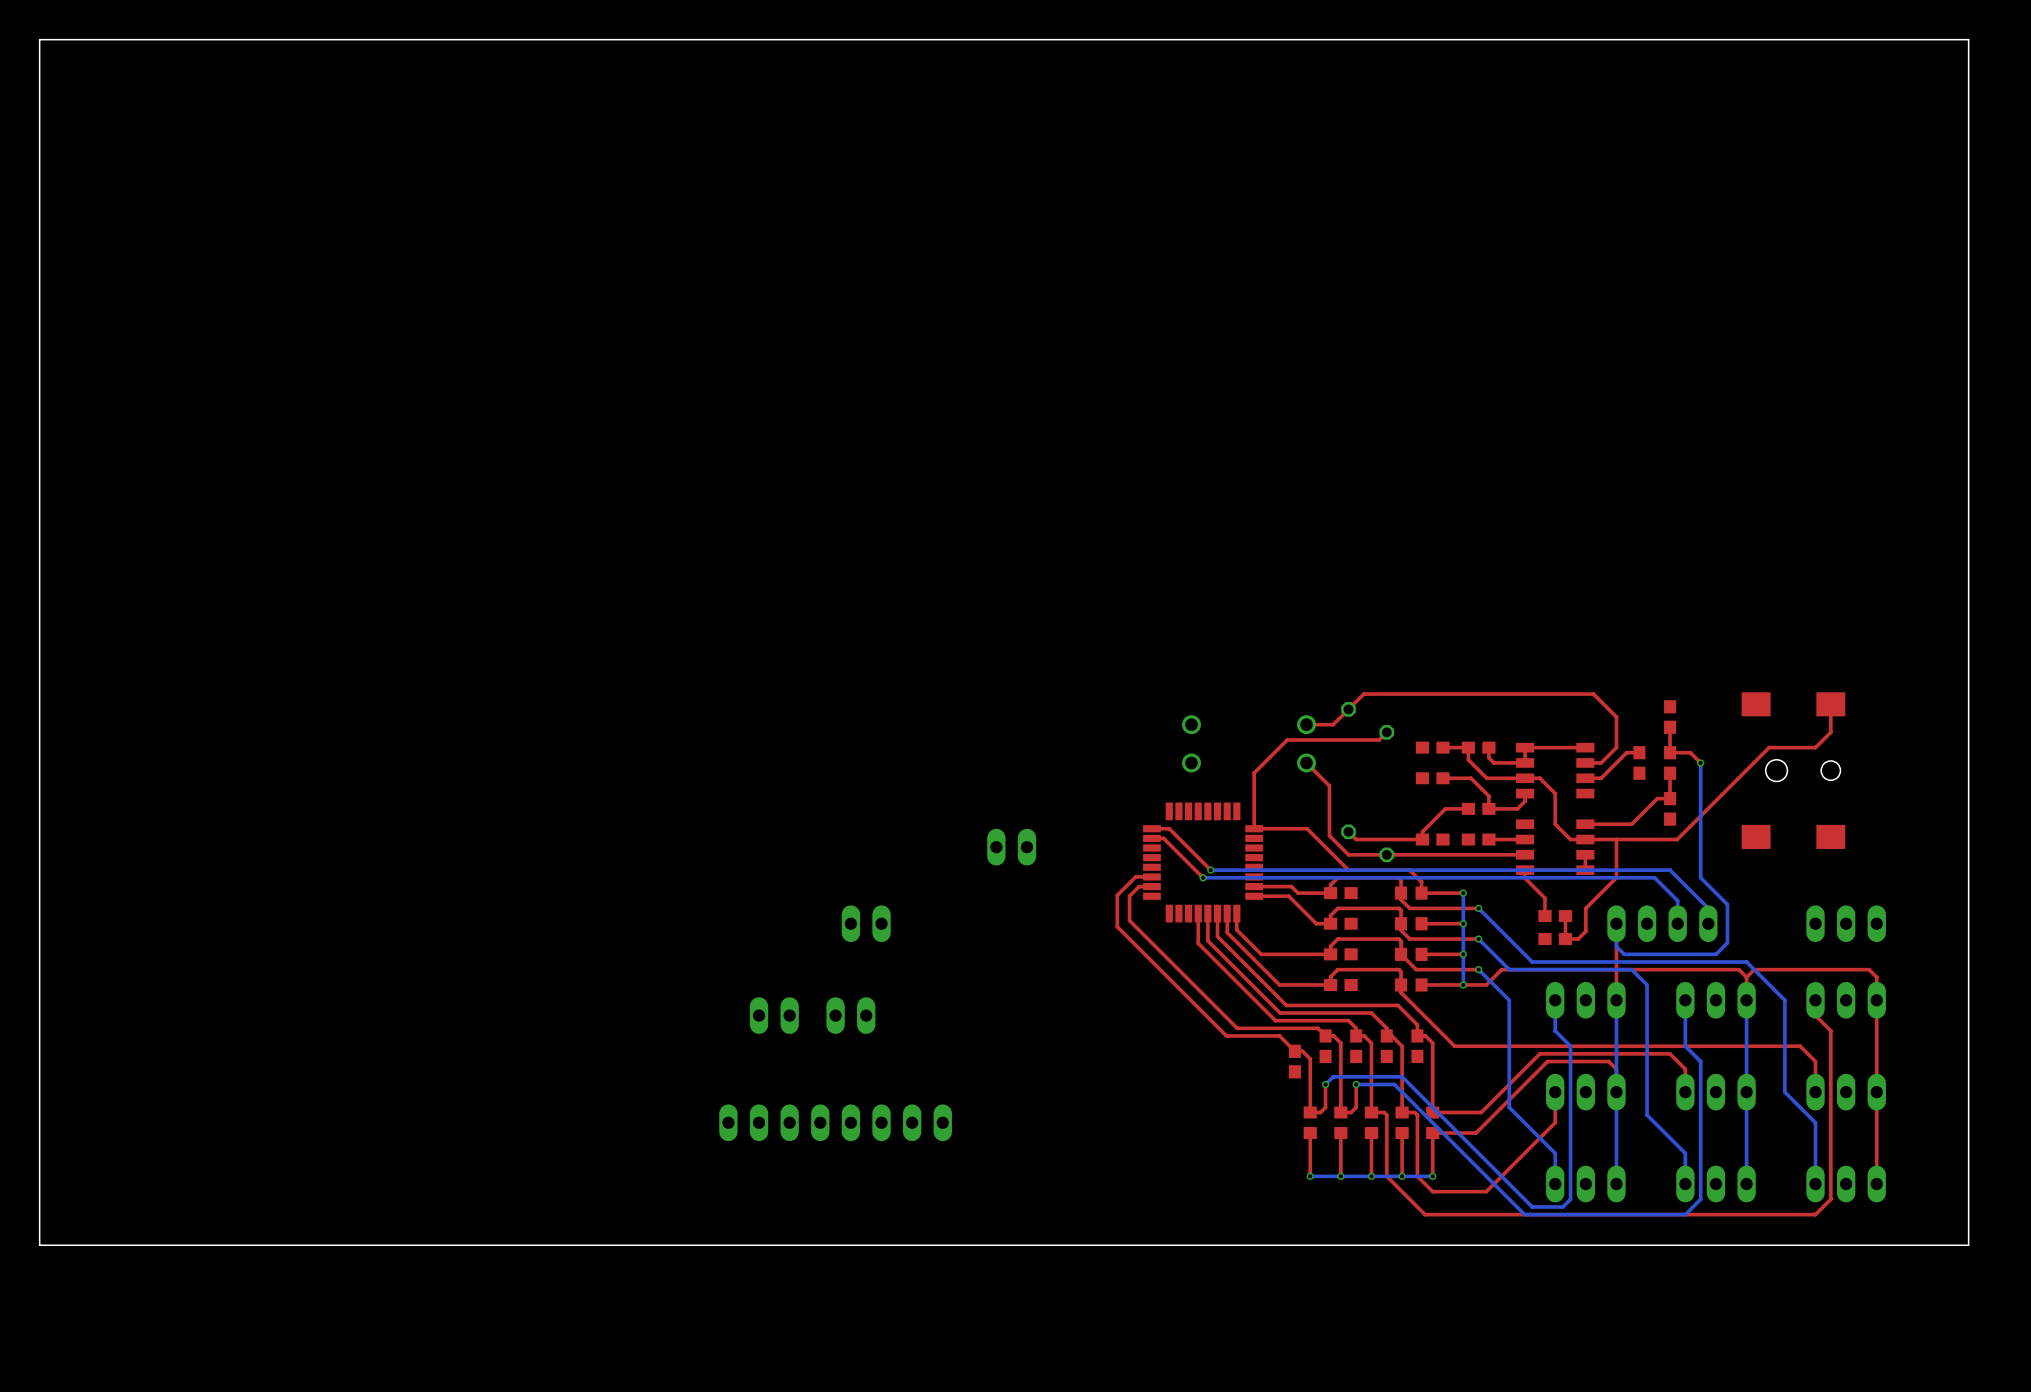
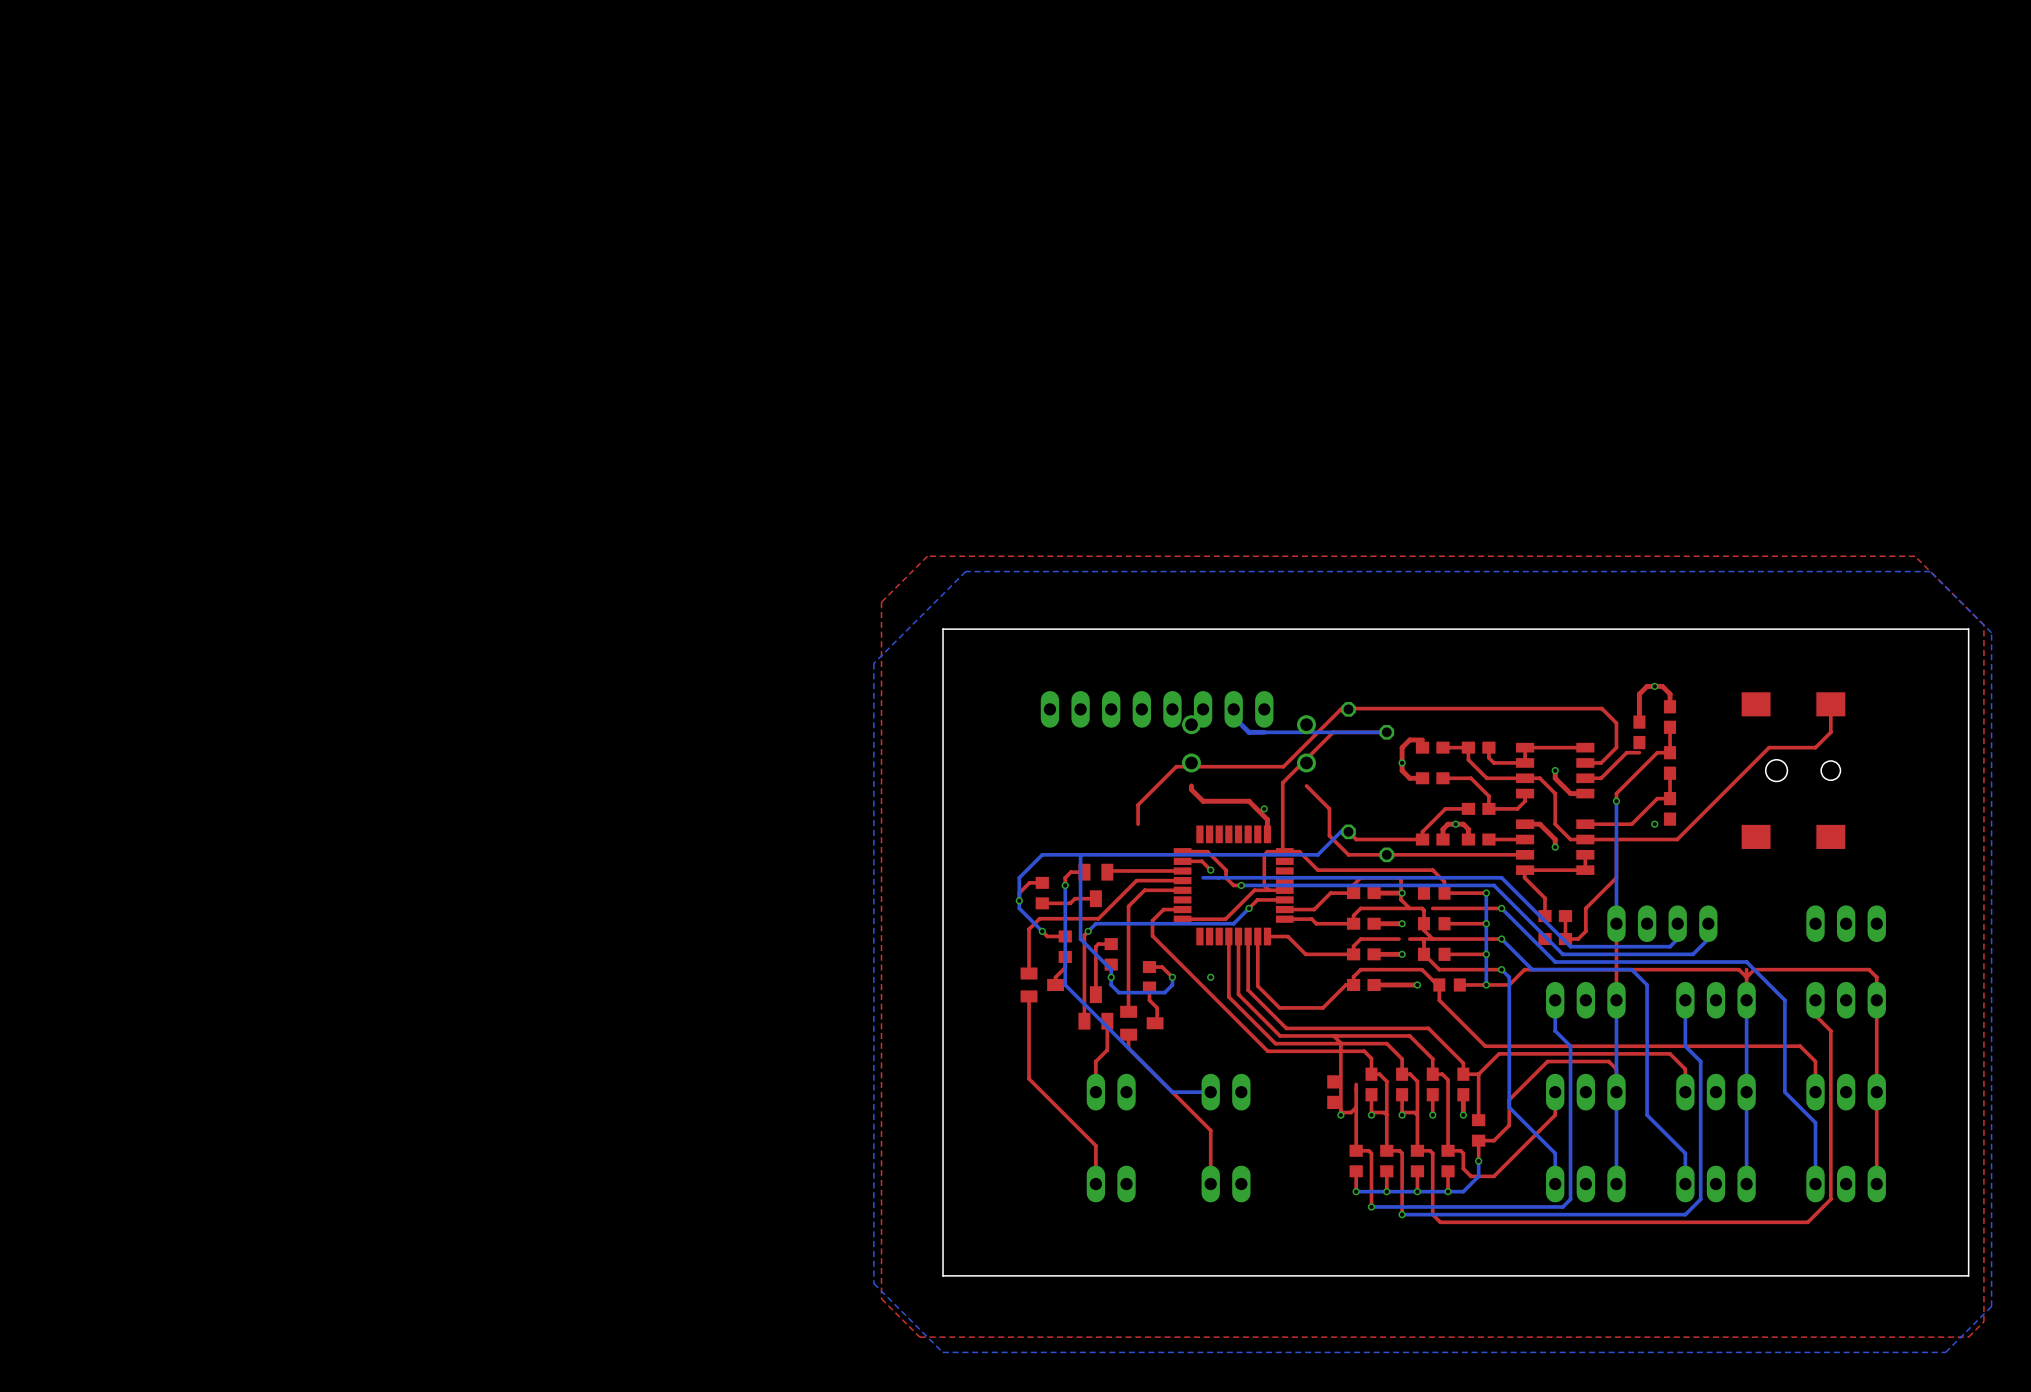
top zone outline: none -> (1915, 556) (1983, 625) (1983, 1321) (1968, 1337) (919, 1337) (881, 1298) (881, 602) (927, 556) (1915, 556)
bottom zone outline: none -> (1930, 571) (1991, 632) (1991, 1306) (1945, 1352) (942, 1352) (873, 1283) (873, 663) (965, 571) (1930, 571)
board edge: (1968, 629) (1968, 39) (39, 39) (39, 1245) (1968, 1245) -> (1968, 629) (943, 629) (943, 1275) (1968, 1275) (1968, 1245)
via: none -> (1654, 686)
top track: none -> (1670, 706) (1670, 694) (1662, 686) (1647, 686) (1639, 694) (1639, 722)
top track: (1349, 708) (1363, 694) (1593, 694) (1616, 717) (1616, 723) -> (1349, 708) (1601, 708) (1616, 723)
part: none -> (1157, 709)
bottom track: none -> (1233, 709) (1233, 717) (1249, 732) (1386, 732)
top track: (1348, 709) (1333, 724) (1306, 724) -> (1348, 709) (1340, 709) (1283, 766) (1176, 766) (1138, 804) (1138, 824)
top track: (1386, 732) (1379, 739) (1287, 739) (1254, 773) (1254, 828) (1307, 828) (1348, 870) -> (1386, 732) (1333, 732) (1282, 782) (1282, 849) (1284, 851)
top track: none -> (1422, 739) (1409, 739) (1402, 747) (1402, 770) (1409, 778) (1422, 778)
top track: (1670, 752) (1690, 752) (1700, 762) -> (1670, 752) (1657, 752) (1616, 793) (1616, 801)
top track: (1306, 762) (1329, 785) (1329, 808) -> (1306, 785) (1329, 808)
via: none -> (1402, 762)
part position: (1639, 762) -> (1639, 732)
bottom track: (1700, 762) (1700, 877) (1727, 904) (1727, 942) (1715, 954) (1693, 954) -> (1708, 923) (1708, 939) (1693, 954)
via: (1700, 762) -> none
top track: none -> (1555, 770) (1555, 778) (1570, 793) (1585, 793)
via: none -> (1555, 770)
top track: none -> (1191, 785) (1191, 789) (1203, 801) (1249, 801) (1267, 819) (1267, 834)
bottom track: none -> (1616, 801) (1616, 916)
via: none -> (1616, 801)
via: none -> (1264, 808)
via: none -> (1455, 824)
top track: none -> (1525, 824) (1539, 824) (1555, 839) (1555, 847)
via: none -> (1654, 824)
top track: (1151, 828) (1169, 828) (1201, 861) -> (1182, 861) (1201, 861)
bottom track: none -> (1348, 831) (1340, 831) (1317, 854) (1042, 854) (1019, 877) (1019, 908) (1042, 931)
top track: (1151, 838) (1163, 838) (1203, 877) -> none
top track: none -> (1468, 839) (1468, 829) (1463, 824) (1448, 824) (1442, 829) (1442, 839)
part: (1011, 847) -> none
via: none -> (1555, 847)
top track: none -> (1182, 851) (1207, 851) (1226, 870) (1226, 877) (1233, 885) (1241, 885)
bottom track: none -> (1080, 854) (1080, 939) (1111, 969) (1111, 984) (1118, 992) (1164, 992) (1172, 984) (1172, 977)
part position: (1203, 862) -> (1233, 885)
top track: none -> (1182, 870) (1107, 872)
bottom track: (1210, 870) (1670, 870) (1708, 908) (1708, 916) -> none
top track: none -> (1348, 870) (1317, 870) (1299, 851) (1267, 851) (1264, 854) (1264, 885) (1269, 890)
top track: (1409, 870) (1421, 881) (1421, 893) (1444, 893) -> (1409, 870) (1432, 870) (1444, 881) (1444, 893)
top track: none -> (1084, 872) (1070, 872) (1065, 877) (1065, 885)
top track: (1151, 876) (1135, 876) (1117, 895) (1117, 926) (1226, 1035) (1279, 1035) (1294, 1051) -> (1182, 909) (1163, 909) (1152, 920) (1152, 935) (1267, 1051) (1294, 1051)
via: (1203, 877) -> none
top track: (1360, 877) (1337, 877) (1330, 884) (1330, 893) (1297, 893) (1291, 886) (1254, 886) -> (1360, 877) (1353, 884) (1353, 893) (1330, 893) (1314, 909) (1284, 909)
bottom track: (1501, 877) (1654, 877) (1677, 900) (1677, 916) -> (1501, 877) (1570, 946) (1670, 946) (1677, 939) (1677, 923)
top track: none -> (1182, 880) (1136, 880) (1098, 918) (1039, 918) (1029, 929) (1029, 973)
top track: none -> (1042, 882) (1029, 882) (1019, 893) (1019, 900)
bottom track: none -> (1065, 885) (1065, 984) (1172, 1092) (1210, 1092)
via: none -> (1065, 885)
part: none -> (1095, 885)
via: none -> (1241, 885)
top track: (1151, 886) (1139, 886) (1129, 896) (1129, 920) (1237, 1028) (1317, 1028) (1325, 1035) -> (1238, 936) (1238, 994) (1280, 1035) (1325, 1035)
top track: none -> (1182, 890) (1144, 890) (1128, 906) (1128, 1011)
top track: none -> (1284, 890) (1254, 890) (1225, 919) (1182, 919)
part: none -> (1042, 893)
part: (1340, 893) -> none
part: none -> (1363, 893)
top track: none -> (1402, 893) (1374, 893)
via: none -> (1402, 893)
part: (1411, 893) -> none
part: none -> (1434, 893)
bottom track: (1463, 893) (1463, 984) -> (1486, 893) (1486, 984)
via: (1463, 893) -> none
top track: none -> (1486, 893) (1463, 893)
via: none -> (1486, 893)
top track: (1254, 896) (1288, 896) (1311, 919) -> (1284, 919) (1311, 919)
top track: none -> (1095, 898) (1074, 898) (1070, 903) (1042, 903)
top track: none -> (1284, 899) (1257, 899) (1249, 908)
via: none -> (1019, 900)
bottom track: none -> (1249, 908) (1233, 923) (1095, 923) (1088, 931)
via: none -> (1249, 908)
top track: (1360, 908) (1337, 908) (1330, 915) (1330, 923) -> (1360, 908) (1353, 915) (1353, 923) (1330, 923)
top track: (1399, 908) (1401, 910) (1401, 930) (1409, 939) -> (1399, 908) (1409, 908)
top track: (1432, 908) (1422, 908) -> (1432, 939) (1424, 930) (1424, 910) (1422, 908)
bottom track: (1478, 908) (1532, 962) (1555, 962) -> (1501, 908) (1555, 962)
via: (1478, 908) -> none
top track: none -> (1501, 908) (1478, 908)
via: none -> (1501, 908)
top track: (1198, 913) (1198, 943) (1275, 1020) (1348, 1020) (1356, 1028) (1356, 1035) -> (1333, 1035) (1356, 1035)
top track: (1207, 913) (1207, 940) (1280, 1013) (1371, 1013) (1386, 1028) (1386, 1035) -> none
top track: (1217, 913) (1217, 936) (1286, 1005) (1397, 1005) (1417, 1024) (1417, 1035) (1425, 1035) (1432, 1043) (1432, 1058) -> none
top track: (1227, 913) (1227, 932) (1279, 984) (1330, 984) (1330, 976) (1337, 969) (1360, 969) -> (1257, 936) (1257, 986) (1279, 1007) (1322, 1007) (1345, 984) (1353, 984) (1353, 976) (1360, 969)
top track: (1236, 913) (1236, 929) (1261, 954) (1305, 954) -> (1267, 936) (1287, 936) (1305, 954)
part: (866, 923) -> none
part: (1340, 923) -> none
part: none -> (1363, 923)
top track: none -> (1402, 923) (1374, 923)
via: none -> (1402, 923)
part: (1411, 923) -> none
part: none -> (1434, 923)
top track: (1444, 923) (1421, 923) -> (1486, 923) (1463, 923)
via: (1463, 923) -> none
via: none -> (1486, 923)
bottom track: (1616, 923) (1616, 946) (1624, 954) -> (1241, 885) (1493, 885) (1562, 954) (1624, 954)
top track: none -> (1042, 931) (1047, 936) (1065, 936)
via: none -> (1042, 931)
top track: none -> (1088, 931) (1084, 935) (1084, 1021)
via: none -> (1088, 931)
top track: none -> (1228, 936) (1228, 996) (1275, 1043) (1386, 1043) (1402, 1058)
top track: none -> (1248, 936) (1248, 990) (1286, 1028) (1428, 1028) (1463, 1063) (1463, 1074) (1478, 1074)
top track: (1360, 939) (1337, 939) (1330, 946) (1330, 954) -> (1360, 939) (1353, 946) (1353, 954) (1330, 954)
top track: (1399, 939) (1401, 941) (1401, 954) (1416, 969) -> (1399, 969) (1416, 969)
bottom track: (1478, 939) (1509, 969) (1532, 969) -> (1501, 939) (1532, 969)
via: (1478, 939) -> none
top track: none -> (1501, 939) (1478, 939)
via: none -> (1501, 939)
top track: none -> (1111, 944) (1098, 944) (1095, 946) (1095, 994)
part: none -> (1065, 946)
part: none -> (1111, 954)
part: (1340, 954) -> none
part: none -> (1363, 954)
top track: none -> (1402, 954) (1374, 954)
via: none -> (1402, 954)
part: (1411, 954) -> none
part: none -> (1434, 954)
top track: (1444, 954) (1421, 954) -> (1486, 954) (1463, 954)
via: (1463, 954) -> none
via: none -> (1486, 954)
top track: none -> (1065, 956) (1065, 967) (1055, 977) (1055, 984)
top track: none -> (1149, 967) (1162, 967) (1172, 977)
top track: (1399, 969) (1401, 971) (1401, 992) (1454, 1046) (1485, 1046) -> (1439, 984) (1439, 1000) (1485, 1046)
top track: (1439, 969) (1422, 969) -> (1439, 969) (1424, 954) (1424, 941) (1422, 939)
bottom track: (1478, 969) (1509, 1000) -> (1501, 969) (1509, 977) (1509, 1000)
via: (1478, 969) -> none
top track: none -> (1501, 969) (1478, 969)
via: none -> (1501, 969)
top track: (1524, 969) (1501, 969) (1486, 984) -> (1524, 969) (1509, 984) (1486, 984)
top track: none -> (1746, 969) (1746, 977)
via: none -> (1111, 977)
part: none -> (1149, 977)
via: none -> (1172, 977)
via: none -> (1210, 977)
part: none -> (1042, 984)
part: (1340, 984) -> none
part: none -> (1363, 984)
part: (1411, 984) -> none
top track: none -> (1417, 984) (1374, 984)
via: none -> (1417, 984)
top track: (1437, 984) (1421, 984) -> (1437, 984) (1422, 969)
part: none -> (1449, 984)
top track: (1459, 984) (1439, 984) -> none
via: (1463, 984) -> none
via: none -> (1486, 984)
top track: none -> (1149, 987) (1149, 1000) (1157, 1007) (1157, 1021) (1155, 1023)
top track: none -> (1029, 996) (1029, 1078) (1095, 1145) (1095, 1184)
part: none -> (1095, 1007)
part: (774, 1015) -> none
part: (850, 1015) -> none
top track: none -> (1107, 1021) (1107, 1050) (1095, 1061) (1095, 1092)
part: none -> (1141, 1023)
top track: none -> (1128, 1034) (1128, 1048) (1210, 1130) (1210, 1184)
top track: (1364, 1035) (1371, 1043) (1371, 1058) -> (1364, 1035) (1386, 1035)
top track: (1391, 1035) (1402, 1046) (1402, 1058) -> (1391, 1035) (1409, 1035) (1432, 1058)
part: (1325, 1046) -> none
part: (1356, 1046) -> none
part: (1386, 1046) -> none
part: (1417, 1046) -> none
top track: (1302, 1051) (1310, 1058) (1310, 1112) (1320, 1112) (1325, 1107) (1325, 1084) -> (1302, 1051) (1364, 1051) (1371, 1058)
top track: (1539, 1053) (1481, 1112) (1432, 1112) -> (1539, 1053) (1499, 1053) (1478, 1074)
part: (1294, 1061) -> none
top track: (1371, 1074) (1371, 1094) -> (1371, 1074) (1379, 1074) (1386, 1081) (1386, 1115)
top track: (1402, 1074) (1402, 1094) -> (1402, 1074) (1410, 1074) (1417, 1081) (1417, 1115)
top track: (1432, 1074) (1432, 1094) -> (1463, 1094) (1463, 1115)
top track: none -> (1478, 1074) (1478, 1120)
bottom track: (1325, 1084) (1333, 1076) (1402, 1076) (1532, 1206) -> (1371, 1206) (1532, 1206)
via: (1325, 1084) -> none
bottom track: (1356, 1084) (1394, 1084) (1524, 1214) -> (1402, 1214) (1524, 1214)
via: (1356, 1084) -> none
part: none -> (1371, 1084)
part: none -> (1402, 1084)
part: none -> (1432, 1084)
part: none -> (1463, 1084)
part: none -> (1111, 1092)
part: none -> (1226, 1092)
part: none -> (1333, 1092)
top track: (1509, 1099) (1476, 1133) (1432, 1133) (1432, 1153) -> (1509, 1099) (1509, 1125) (1493, 1140) (1478, 1140) (1478, 1161)
via: none -> (1340, 1115)
via: none -> (1371, 1115)
via: none -> (1402, 1115)
via: none -> (1432, 1115)
via: none -> (1463, 1115)
top track: (1555, 1115) (1555, 1122) (1486, 1191) (1432, 1191) (1417, 1176) -> (1555, 1115) (1493, 1176) (1471, 1176) (1463, 1168) (1463, 1153) (1460, 1150) (1448, 1150) (1448, 1079) (1442, 1074) (1432, 1074)
part: (835, 1122) -> none
part: (1310, 1122) -> none
part: (1340, 1122) -> none
part: (1371, 1122) -> none
part: (1402, 1122) -> none
part: (1432, 1122) -> none
part: none -> (1478, 1130)
top track: (1310, 1133) (1310, 1176) -> none
top track: (1340, 1133) (1340, 1176) -> none
top track: (1371, 1133) (1371, 1153) -> (1356, 1107) (1356, 1150) (1368, 1150) (1371, 1153)
top track: (1402, 1133) (1402, 1153) -> (1386, 1150) (1399, 1150) (1402, 1153)
top track: (1386, 1150) (1386, 1171) -> (1448, 1171) (1448, 1191)
top track: (1417, 1150) (1417, 1171) -> (1417, 1150) (1430, 1150) (1432, 1153)
part: none -> (1356, 1161)
part: none -> (1386, 1161)
part: none -> (1417, 1161)
part: none -> (1448, 1161)
bottom track: none -> (1478, 1161) (1478, 1176) (1463, 1191) (1356, 1191)
via: none -> (1478, 1161)
top track: none -> (1356, 1171) (1356, 1191)
via: (1310, 1176) -> none
via: (1340, 1176) -> none
top track: none -> (1371, 1176) (1371, 1206)
via: (1371, 1176) -> none
top track: (1386, 1176) (1425, 1214) (1815, 1214) -> (1432, 1176) (1432, 1214) (1440, 1222) (1807, 1222) (1815, 1214)
top track: none -> (1386, 1176) (1386, 1191)
top track: none -> (1402, 1176) (1402, 1214)
via: (1402, 1176) -> none
top track: none -> (1417, 1176) (1417, 1191)
bottom track: (1432, 1176) (1310, 1176) -> none
via: (1432, 1176) -> none
part: none -> (1111, 1184)
part: none -> (1226, 1184)
via: none -> (1356, 1191)
via: none -> (1386, 1191)
via: none -> (1417, 1191)
via: none -> (1448, 1191)
via: none -> (1371, 1206)
via: none -> (1402, 1214)

